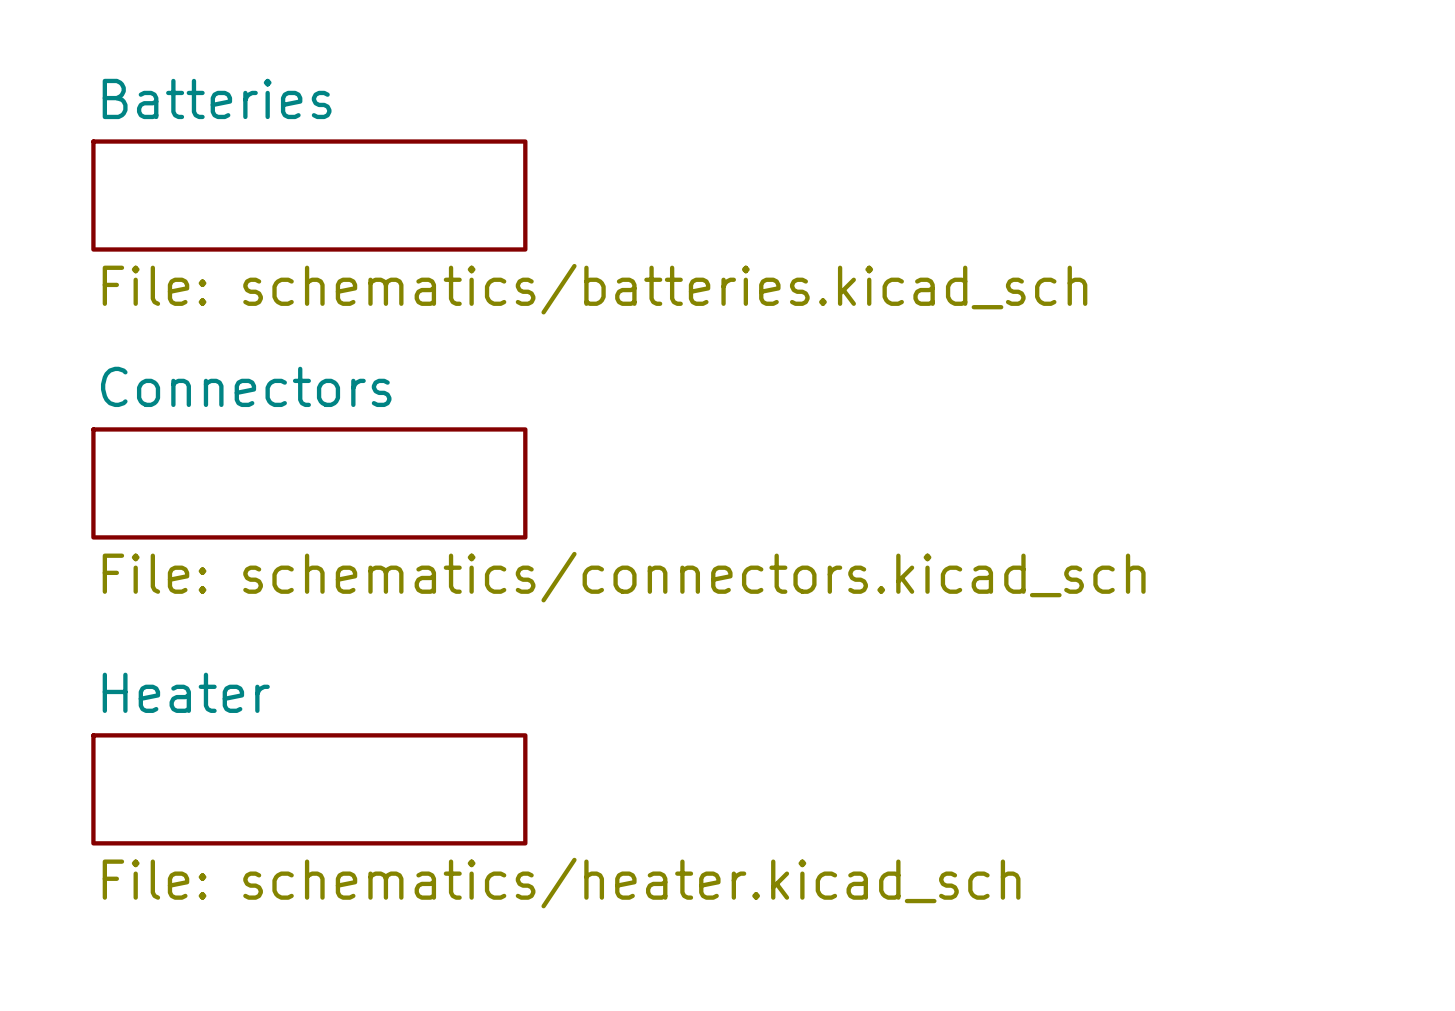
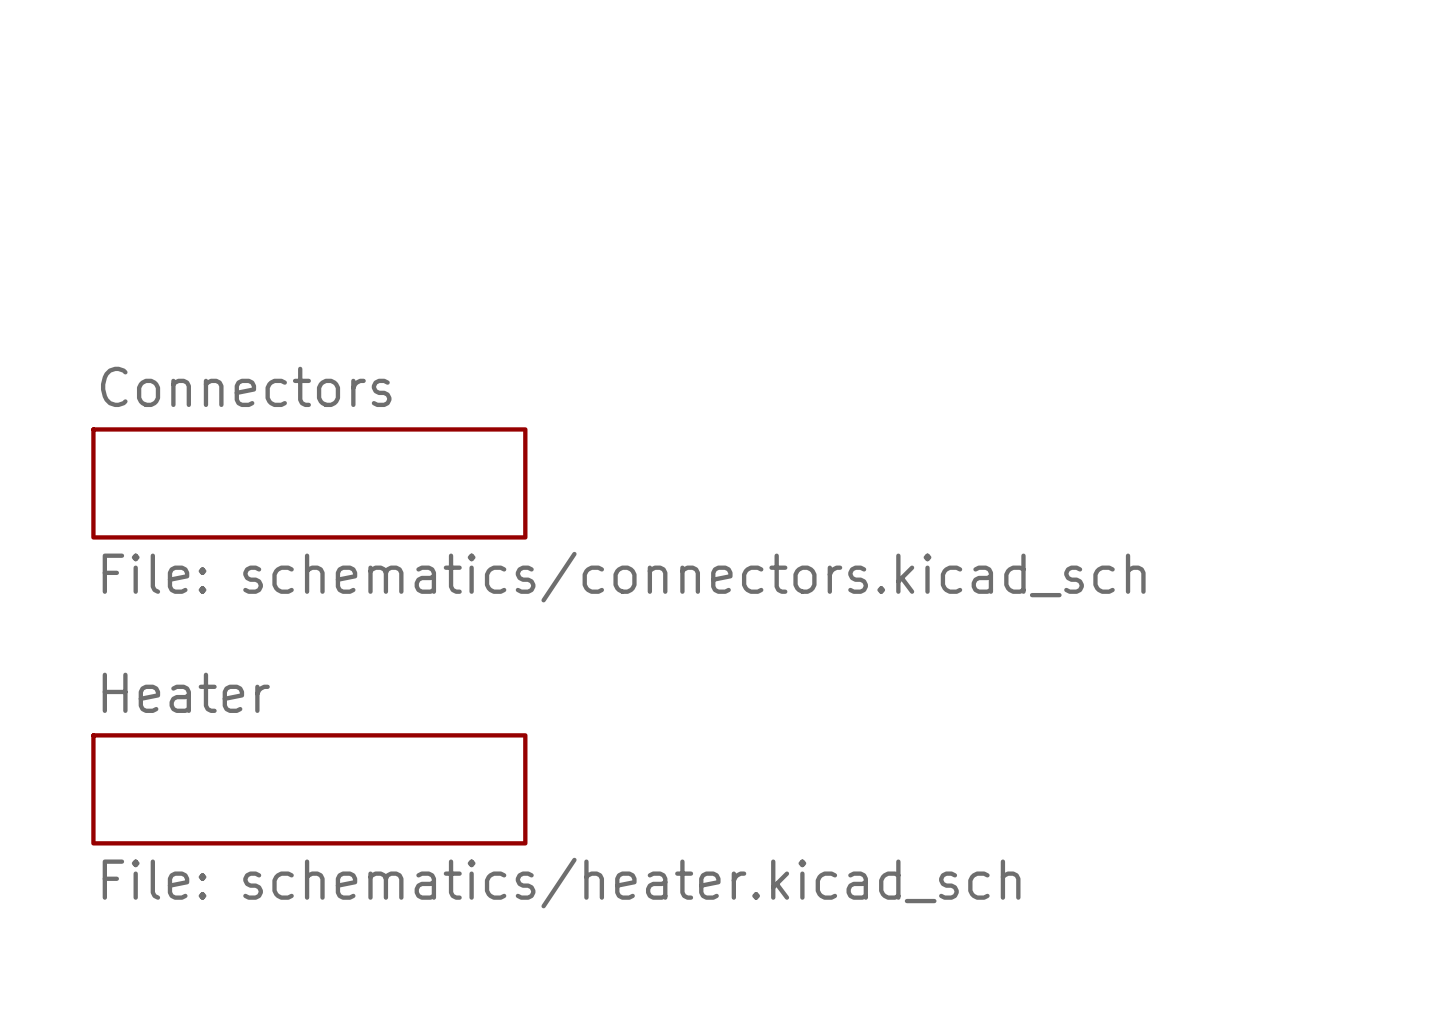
sheet Batteries: File: schematics/batteries.kicad_sch (309, 195) -> none

